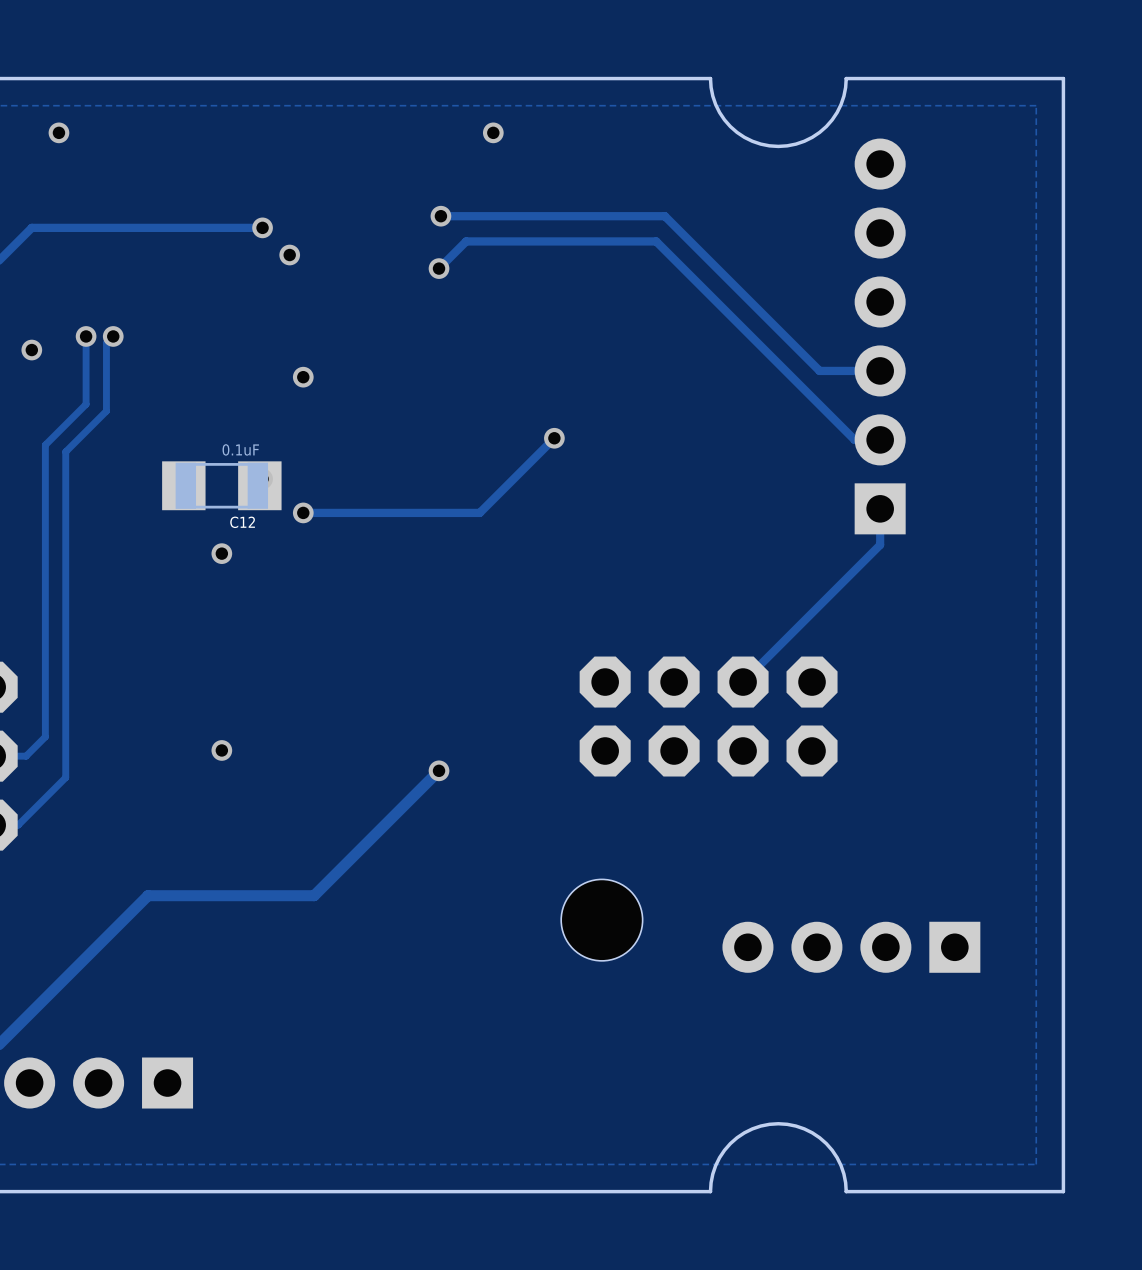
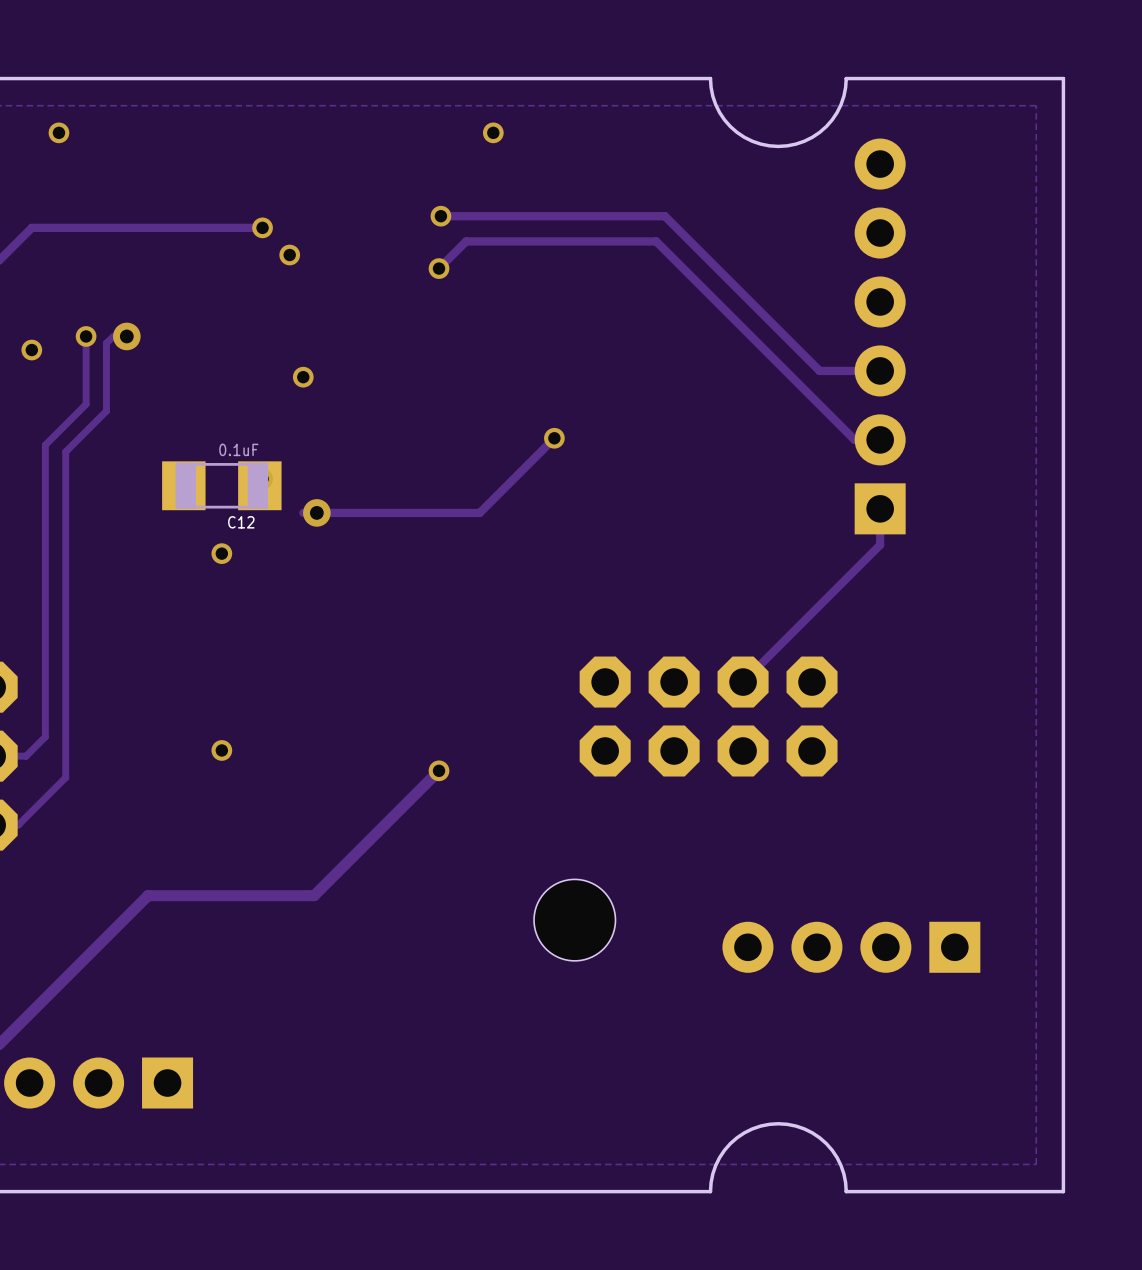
via size: [102, 326, 124, 347] -> [113, 322, 141, 351]
via size: [292, 502, 314, 524] -> [303, 499, 331, 527]
hole position: (601, 920) -> (574, 920)

